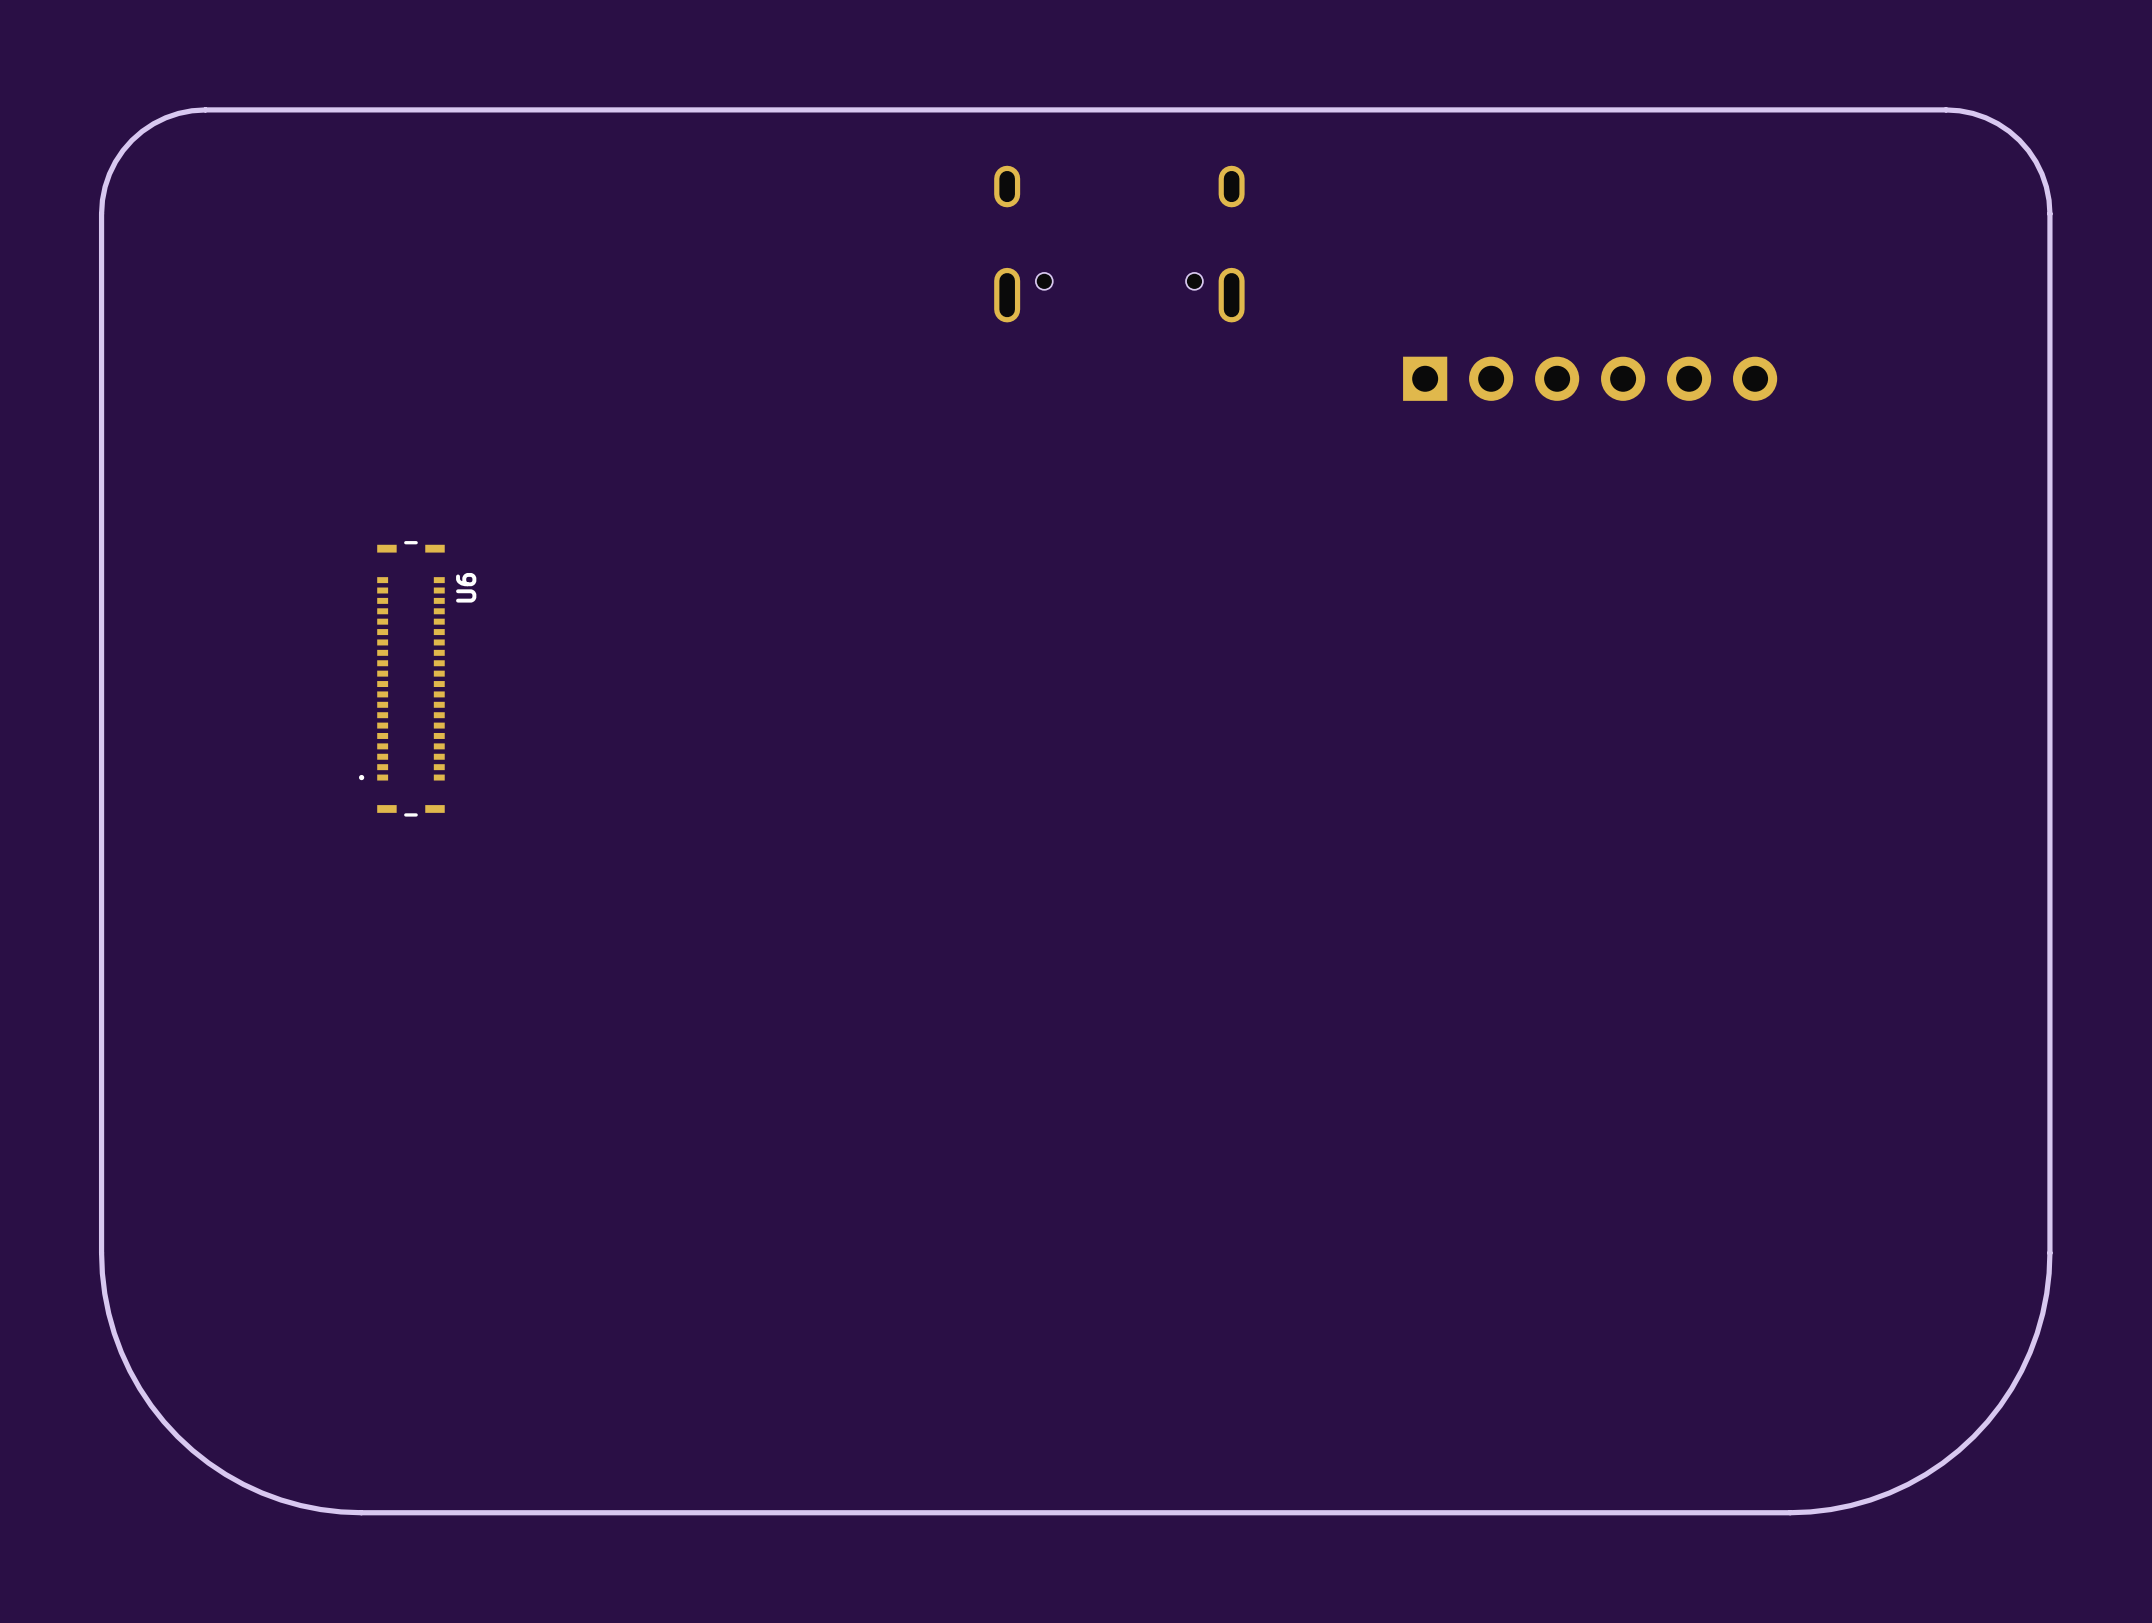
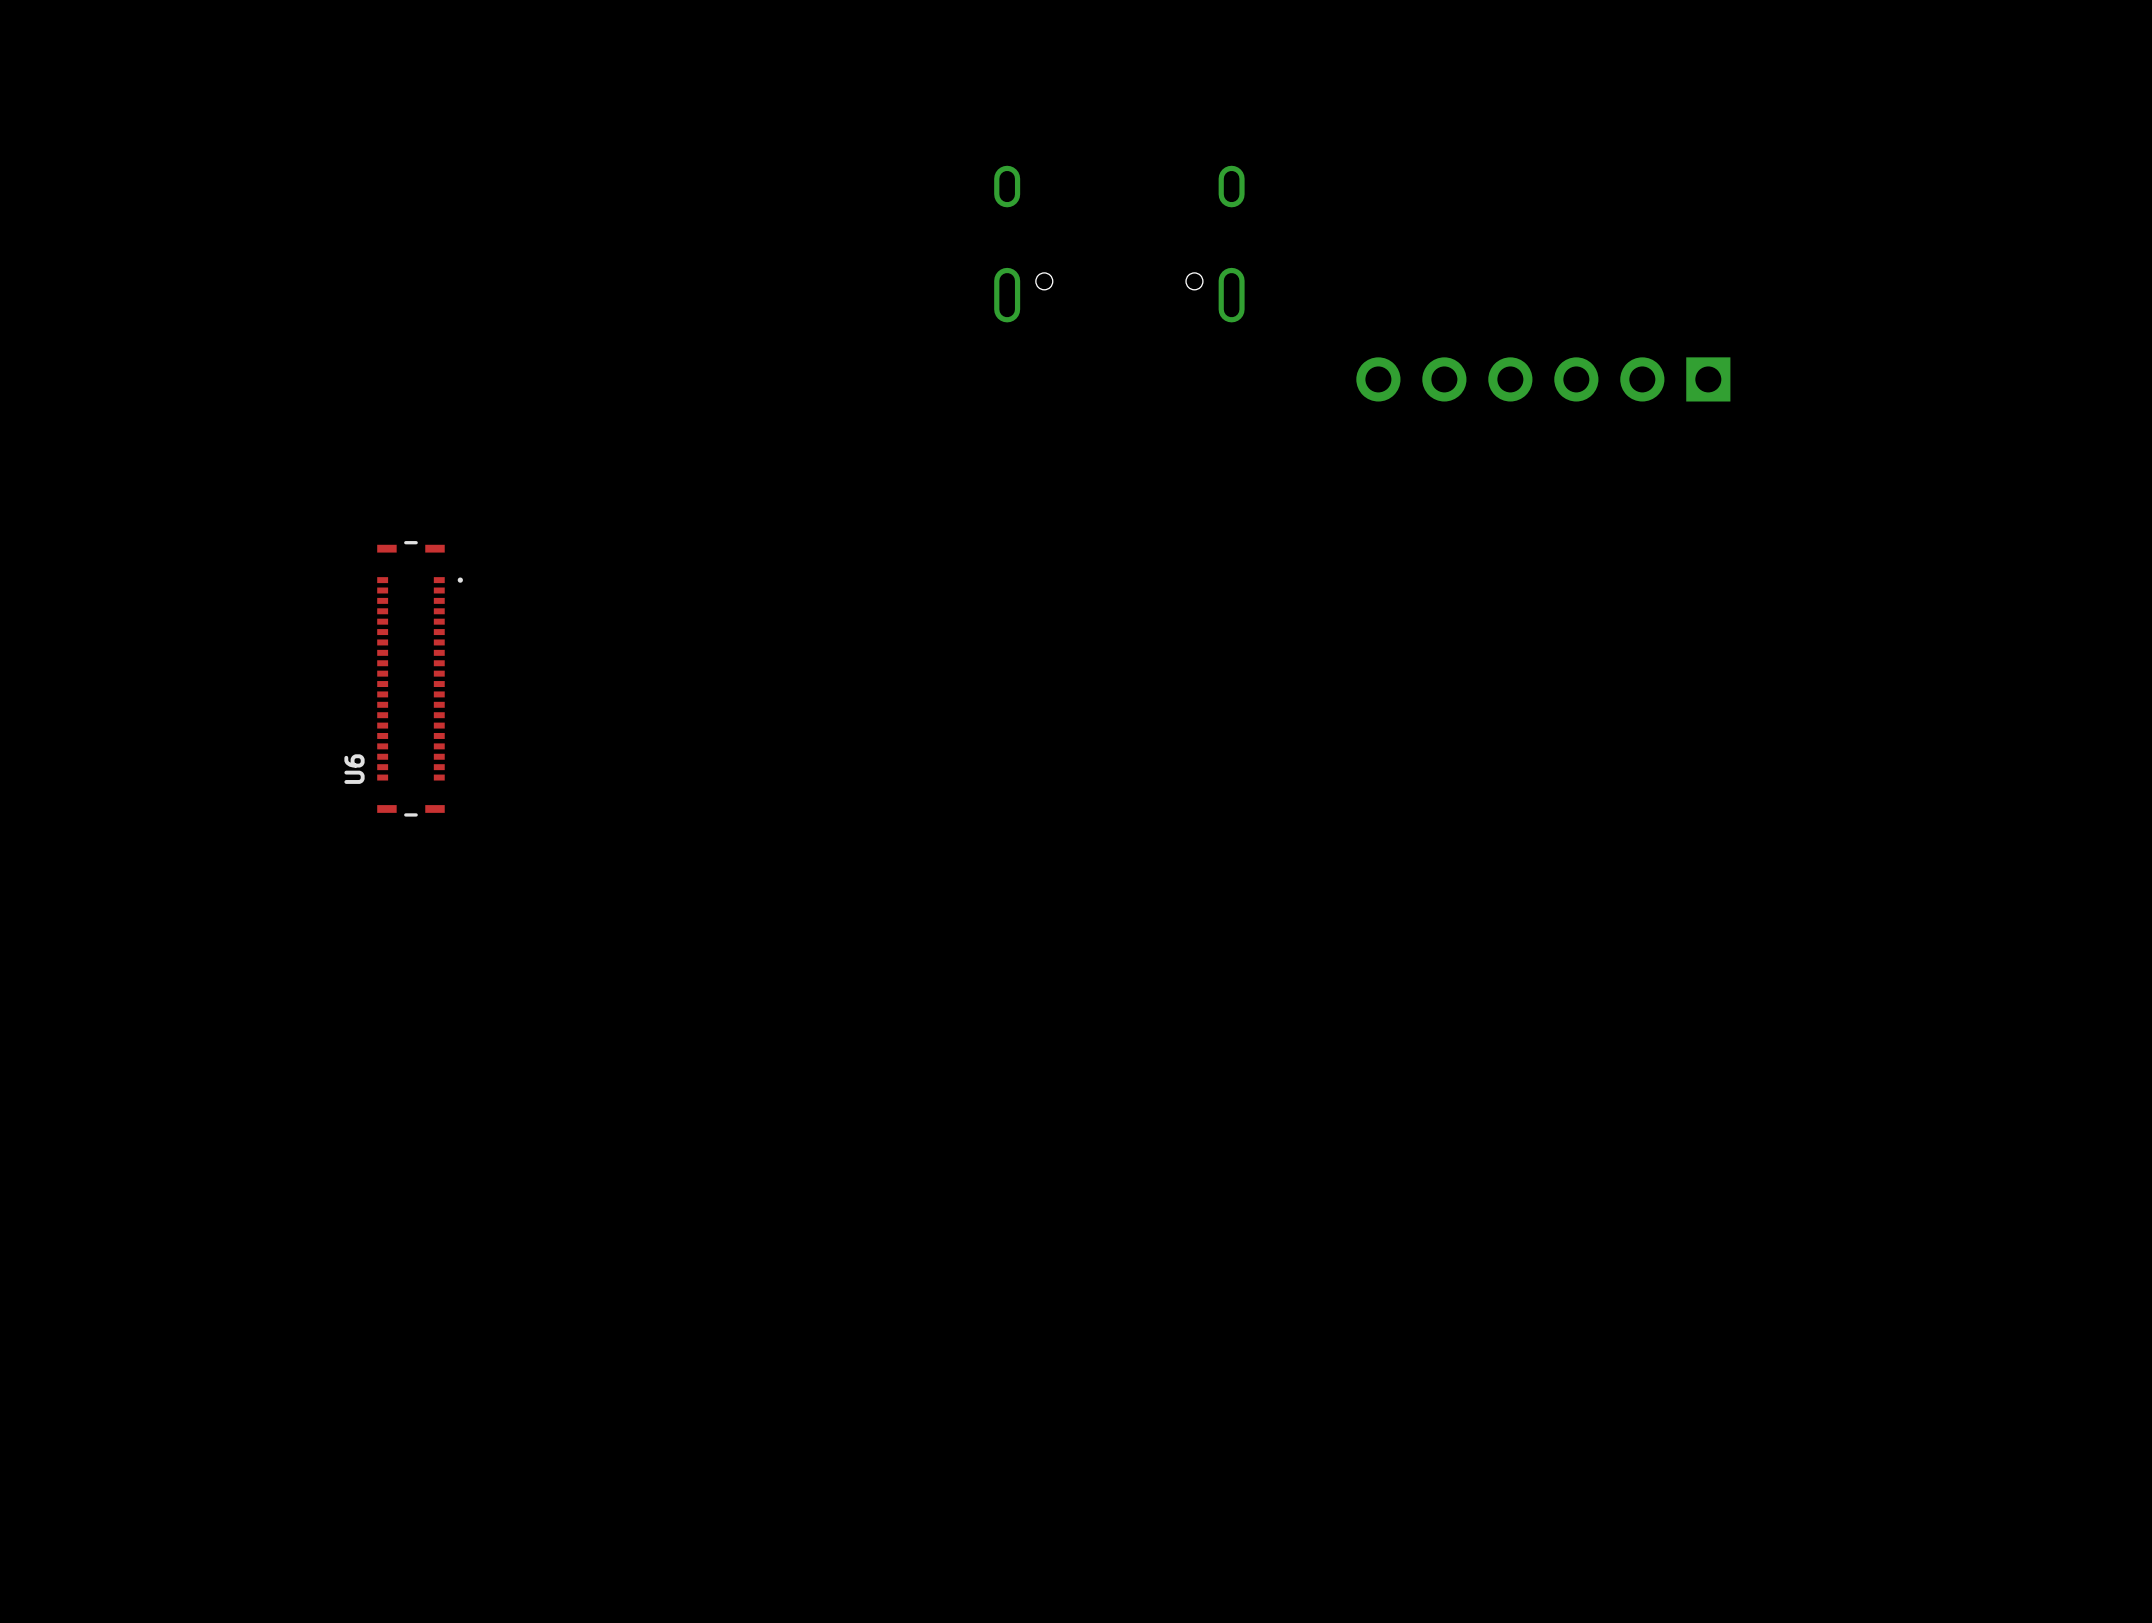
board edge: (205, 109) (1946, 109) (1972, 113) (1997, 123) (2009, 131) (2019, 140) (2036, 161) (2046, 186) (2049, 213) (2049, 1252) (2046, 1293) (2037, 1333) (2021, 1370) (2000, 1405) (1987, 1421) (1958, 1450) (1942, 1463) (1908, 1484) (1889, 1492) (1850, 1505) (1810, 1511) (1790, 1512) (361, 1512) (320, 1509) (281, 1500) (243, 1484) (208, 1463) (177, 1436) (163, 1421) (139, 1388) (129, 1370) (121, 1352) (108, 1313) (104, 1293) (101, 1252) (102, 200) (109, 174) (123, 150) (131, 140) (142, 131) (165, 117) (178, 113) (205, 109) -> none
part rotation: 0° (1590, 378) -> 180° (1543, 379)
U6 rotation: 0° (401, 678) -> 180° (420, 678)

